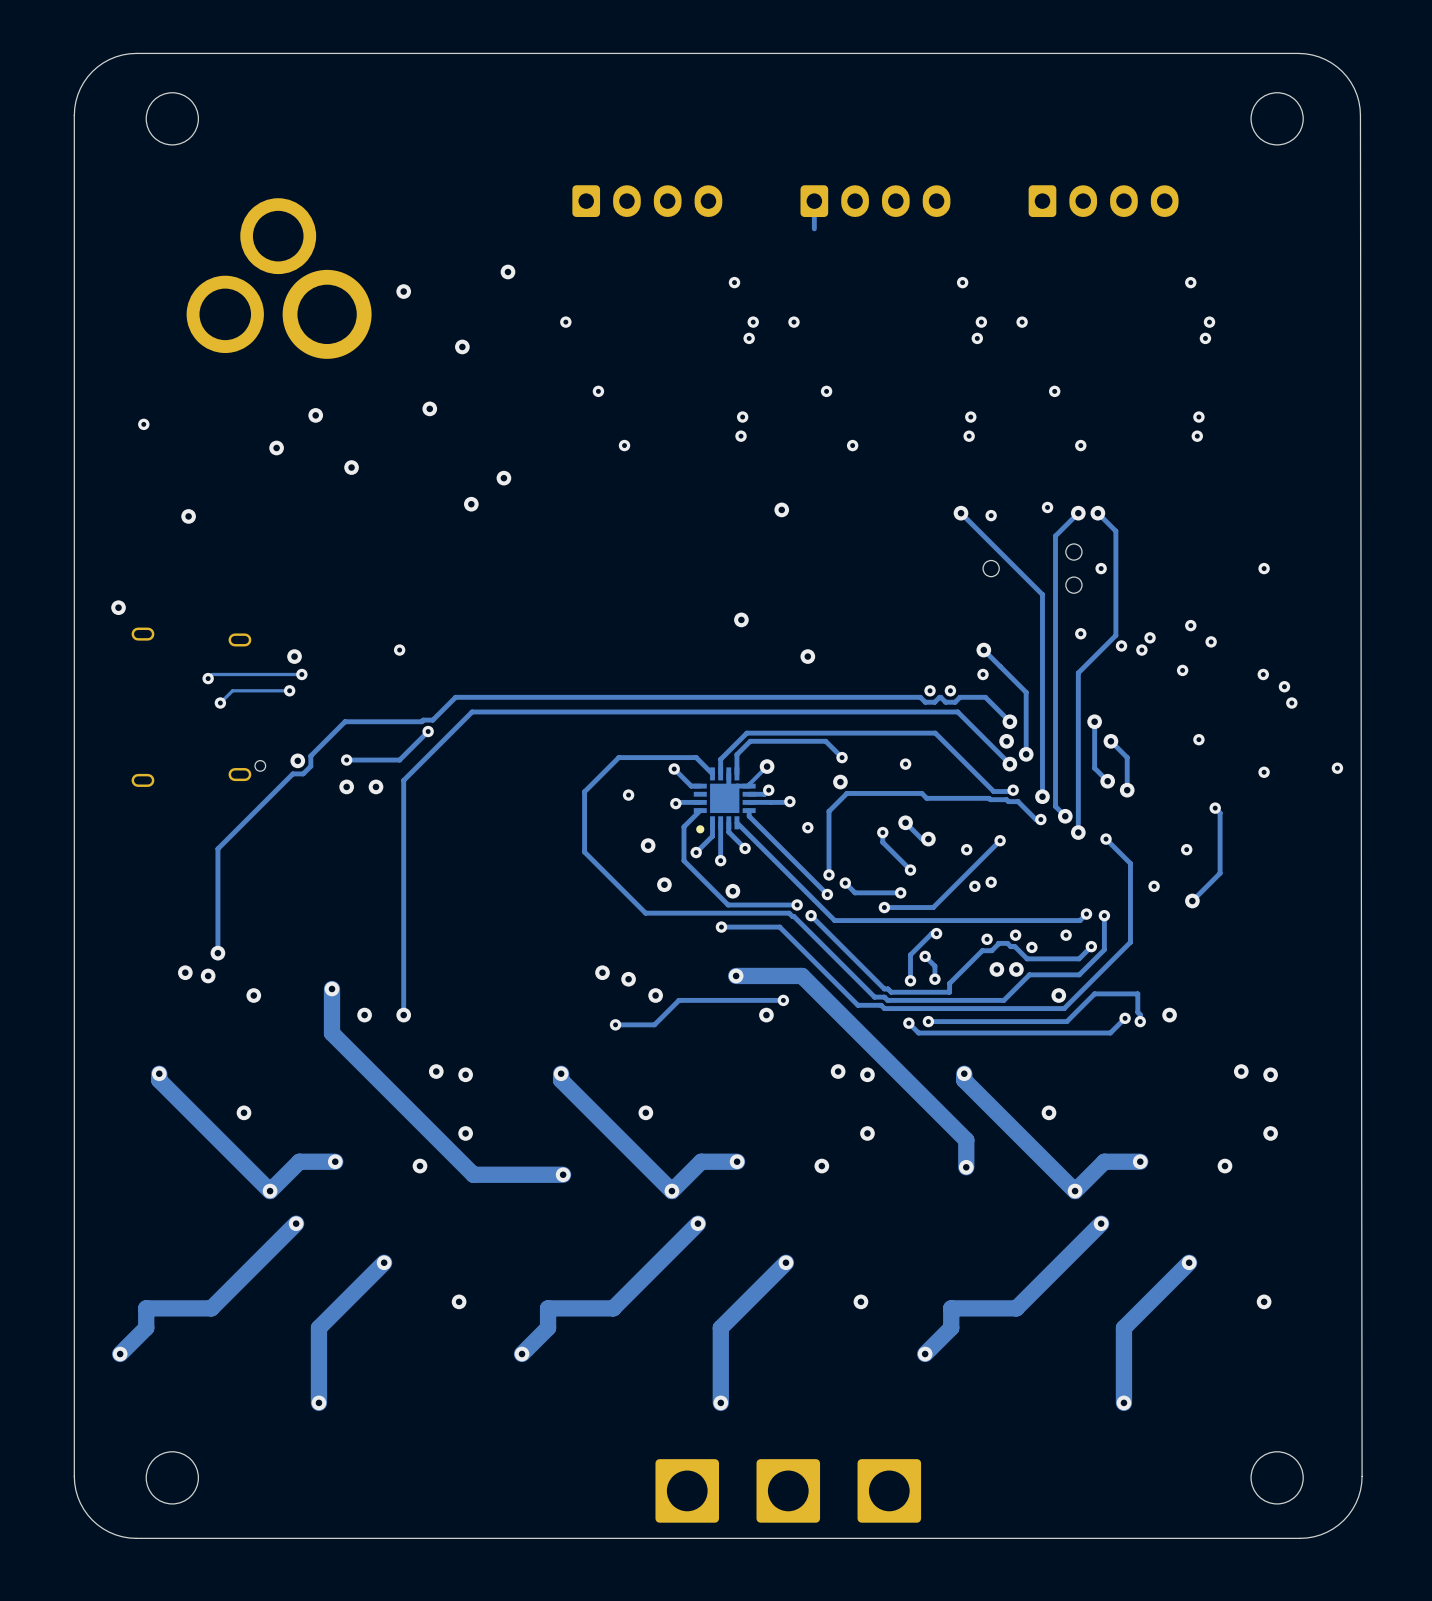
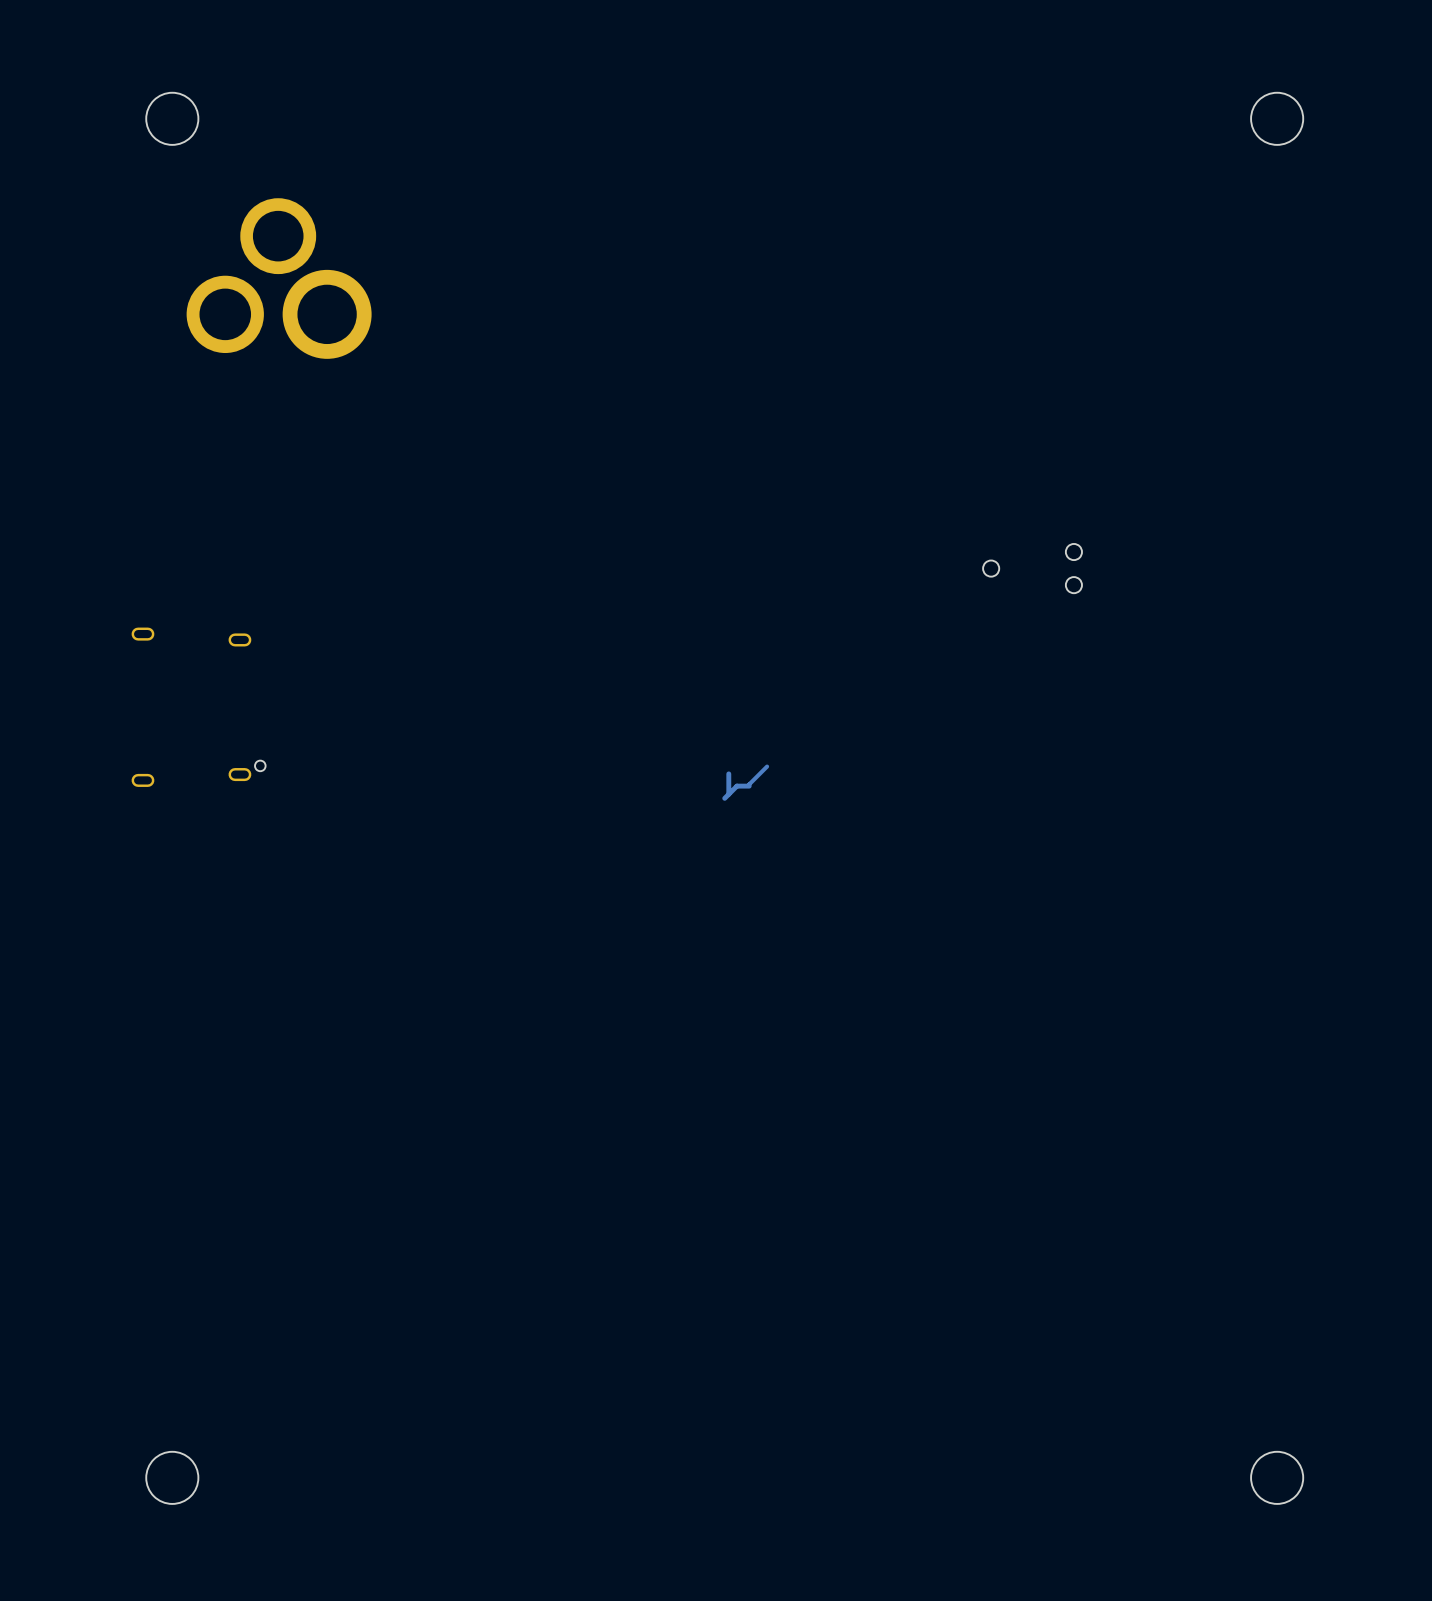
board edge: (1298, 53) (136, 53) (122, 54) (109, 59) (97, 66) (87, 76) (77, 94) (74, 115) (74, 1476) (75, 1490) (80, 1503) (87, 1515) (97, 1524) (115, 1534) (136, 1538) (1300, 1538) (1313, 1536) (1327, 1532) (1338, 1524) (1348, 1515) (1358, 1496) (1362, 1476) (1360, 115) (1356, 94) (1350, 82) (1342, 71) (1331, 62) (1318, 56) (1298, 53) -> none
part: (647, 201) -> none
track: (814, 201) (814, 228) -> none
part: (875, 201) -> none
part: (1103, 201) -> none
via: (507, 272) -> none
via: (734, 282) -> none
via: (962, 282) -> none
via: (1190, 282) -> none
via: (403, 291) -> none
via: (565, 322) -> none
via: (753, 322) -> none
via: (793, 322) -> none
via: (981, 322) -> none
via: (1022, 322) -> none
via: (1209, 322) -> none
via: (749, 338) -> none
via: (977, 338) -> none
via: (1205, 338) -> none
via: (462, 346) -> none
via: (598, 391) -> none
via: (826, 391) -> none
via: (1054, 391) -> none
via: (429, 408) -> none
via: (315, 415) -> none
via: (742, 417) -> none
via: (970, 417) -> none
via: (1198, 417) -> none
via: (143, 424) -> none
via: (741, 436) -> none
via: (969, 436) -> none
via: (1197, 436) -> none
via: (624, 445) -> none
via: (852, 445) -> none
via: (1080, 445) -> none
via: (276, 447) -> none
via: (351, 467) -> none
via: (503, 478) -> none
via: (471, 504) -> none
via: (1047, 507) -> none
via: (781, 509) -> none
track: (961, 513) (1042, 594) (1042, 796) -> none
via: (961, 513) -> none
track: (1078, 513) (1055, 535) (1055, 806) (1065, 816) -> none
via: (1078, 513) -> none
track: (1097, 513) (1115, 531) (1115, 635) (1078, 673) (1078, 832) -> none
via: (1097, 513) -> none
via: (991, 515) -> none
via: (188, 516) -> none
via: (1101, 568) -> none
via: (1264, 568) -> none
via: (118, 607) -> none
via: (741, 619) -> none
via: (1190, 625) -> none
via: (1080, 633) -> none
via: (1150, 637) -> none
via: (1211, 641) -> none
via: (1121, 645) -> none
via: (399, 650) -> none
track: (983, 650) (1026, 692) (1026, 754) -> none
via: (983, 650) -> none
via: (1141, 650) -> none
via: (294, 656) -> none
via: (807, 656) -> none
via: (1182, 670) -> none
track: (301, 674) (212, 674) (208, 678) -> none
via: (301, 674) -> none
via: (983, 674) -> none
via: (1263, 674) -> none
via: (208, 678) -> none
via: (1284, 686) -> none
track: (289, 690) (232, 690) (220, 703) -> none
via: (289, 690) -> none
via: (930, 690) -> none
via: (950, 690) -> none
via: (220, 703) -> none
via: (1291, 703) -> none
track: (1009, 721) (985, 697) (960, 697) (955, 702) (945, 702) (940, 697) (934, 702) (925, 702) (920, 697) (455, 697) (432, 720) (345, 721) (310, 755) (310, 766) (303, 773) (292, 773) (217, 848) (217, 953) -> none
via: (1009, 721) -> none
track: (1094, 721) (1094, 768) (1107, 781) -> none
via: (1094, 721) -> none
track: (428, 731) (399, 760) (346, 760) -> none
via: (428, 731) -> none
via: (1198, 739) -> none
via: (1006, 741) -> none
track: (1110, 741) (1127, 757) (1127, 790) -> none
via: (1110, 741) -> none
via: (1026, 754) -> none
track: (842, 757) (825, 741) (750, 741) (736, 754) (736, 773) -> none
via: (842, 757) -> none
via: (297, 760) -> none
via: (346, 760) -> none
via: (905, 764) -> none
track: (1009, 764) (957, 711) (472, 711) (403, 780) (403, 1015) -> none
via: (1009, 764) -> none
via: (767, 766) -> none
via: (1337, 768) -> none
track: (674, 769) (691, 786) (700, 786) -> none
via: (674, 769) -> none
via: (1264, 772) -> none
track: (712, 773) (696, 757) (618, 757) (584, 791) (584, 852) (645, 913) (789, 913) (874, 997) (884, 997) (887, 1000) (1003, 1000) (1029, 974) (1079, 974) (1104, 949) (1104, 915) -> none
track: (720, 773) (720, 759) (746, 733) (935, 733) (993, 791) (1013, 790) -> none
via: (1107, 781) -> none
via: (840, 782) -> none
via: (346, 786) -> none
via: (376, 786) -> none
track: (768, 790) (764, 794) (749, 794) -> none
via: (768, 790) -> none
via: (1013, 790) -> none
via: (1127, 790) -> none
via: (628, 795) -> none
via: (1042, 796) -> none
part: (724, 800) -> none
track: (789, 801) (749, 802) -> none
via: (789, 801) -> none
track: (1017, 801) (1035, 819) (1040, 819) -> none
track: (1017, 801) (989, 798) (926, 798) (921, 793) (846, 793) (829, 811) (829, 874) -> none
track: (700, 802) (675, 803) -> none
via: (675, 803) -> none
track: (1215, 808) (1220, 813) (1220, 873) (1192, 901) -> none
via: (1215, 808) -> none
track: (700, 810) (683, 826) (683, 860) (728, 904) (797, 904) -> none
track: (749, 810) (749, 816) (827, 894) -> none
via: (1065, 816) -> none
via: (1040, 819) -> none
track: (712, 822) (712, 836) (696, 852) -> none
track: (720, 822) (720, 860) -> none
track: (728, 822) (728, 832) (745, 848) -> none
track: (736, 822) (834, 920) (1079, 920) (1086, 914) -> none
track: (905, 822) (921, 839) (928, 839) -> none
via: (905, 822) -> none
via: (807, 827) -> none
track: (882, 832) (882, 842) (910, 870) -> none
via: (882, 832) -> none
via: (1078, 832) -> none
via: (928, 839) -> none
track: (1106, 839) (1130, 863) (1130, 942) (1064, 1008) (884, 1008) (881, 1005) (857, 1005) (779, 927) (721, 927) -> none
via: (1106, 839) -> none
track: (1000, 840) (933, 907) (884, 907) -> none
via: (1000, 840) -> none
via: (648, 845) -> none
via: (745, 848) -> none
via: (966, 849) -> none
via: (1186, 849) -> none
via: (696, 852) -> none
via: (720, 860) -> none
via: (910, 870) -> none
via: (829, 874) -> none
via: (991, 882) -> none
track: (845, 883) (855, 892) (900, 892) -> none
via: (845, 883) -> none
via: (664, 884) -> none
via: (974, 886) -> none
via: (1154, 886) -> none
via: (732, 891) -> none
via: (900, 892) -> none
via: (827, 894) -> none
via: (1192, 901) -> none
via: (797, 904) -> none
via: (884, 907) -> none
via: (1086, 914) -> none
track: (811, 915) (884, 988) (887, 988) (891, 992) (949, 992) (949, 983) (982, 950) (991, 950) (998, 943) (1007, 943) (1010, 946) (1014, 946) (1027, 958) (1079, 958) (1091, 946) -> none
via: (811, 915) -> none
via: (1104, 915) -> none
via: (721, 927) -> none
track: (936, 933) (931, 933) (910, 954) (910, 980) -> none
via: (936, 933) -> none
via: (1015, 935) -> none
via: (1066, 935) -> none
via: (987, 939) -> none
via: (1091, 946) -> none
via: (1031, 947) -> none
via: (217, 953) -> none
track: (925, 956) (934, 966) (934, 979) -> none
via: (925, 956) -> none
via: (996, 969) -> none
via: (1016, 969) -> none
via: (185, 972) -> none
via: (602, 972) -> none
via: (208, 975) -> none
track: (736, 975) (802, 975) (966, 1140) (966, 1167) -> none
via: (736, 975) -> none
via: (628, 979) -> none
via: (934, 979) -> none
via: (910, 980) -> none
track: (332, 989) (332, 1033) (473, 1174) (563, 1174) -> none
via: (332, 989) -> none
via: (253, 995) -> none
via: (655, 995) -> none
via: (1058, 995) -> none
track: (783, 1000) (678, 1000) (654, 1024) (615, 1024) -> none
via: (783, 1000) -> none
via: (364, 1015) -> none
via: (403, 1015) -> none
via: (766, 1015) -> none
via: (1169, 1015) -> none
track: (1125, 1018) (1110, 1033) (918, 1033) (908, 1023) -> none
via: (1125, 1018) -> none
via: (928, 1021) -> none
track: (1140, 1021) (1140, 1014) (1137, 1012) (1137, 993) (1094, 993) (1066, 1021) (928, 1021) -> none
via: (1140, 1021) -> none
via: (908, 1023) -> none
via: (615, 1024) -> none
via: (436, 1071) -> none
via: (838, 1071) -> none
via: (1241, 1071) -> none
track: (159, 1073) (159, 1080) (270, 1191) (299, 1161) (335, 1161) -> none
via: (159, 1073) -> none
track: (561, 1073) (561, 1080) (671, 1191) (701, 1161) (737, 1161) -> none
via: (561, 1073) -> none
track: (964, 1073) (964, 1080) (1075, 1191) (1104, 1161) (1140, 1161) -> none
via: (964, 1073) -> none
via: (465, 1074) -> none
via: (867, 1074) -> none
via: (1270, 1074) -> none
via: (244, 1112) -> none
via: (645, 1112) -> none
via: (1049, 1112) -> none
via: (465, 1133) -> none
via: (867, 1133) -> none
via: (1270, 1133) -> none
via: (335, 1161) -> none
via: (737, 1161) -> none
via: (1140, 1161) -> none
via: (419, 1166) -> none
via: (821, 1166) -> none
via: (1224, 1166) -> none
via: (966, 1167) -> none
via: (563, 1174) -> none
via: (270, 1191) -> none
via: (671, 1191) -> none
via: (1075, 1191) -> none
track: (296, 1223) (211, 1308) (146, 1308) (146, 1327) (120, 1354) -> none
via: (296, 1223) -> none
track: (697, 1223) (613, 1308) (548, 1308) (548, 1327) (522, 1354) -> none
via: (697, 1223) -> none
track: (1101, 1223) (1016, 1308) (951, 1308) (951, 1327) (925, 1354) -> none
via: (1101, 1223) -> none
track: (384, 1262) (318, 1327) (318, 1402) -> none
via: (384, 1262) -> none
track: (785, 1262) (720, 1327) (720, 1402) -> none
via: (785, 1262) -> none
track: (1189, 1262) (1123, 1327) (1123, 1402) -> none
via: (1189, 1262) -> none
via: (459, 1301) -> none
via: (860, 1301) -> none
via: (1264, 1301) -> none
via: (120, 1354) -> none
via: (522, 1354) -> none
via: (925, 1354) -> none
via: (318, 1402) -> none
via: (720, 1402) -> none
via: (1123, 1402) -> none
part: (687, 1490) -> none
part: (788, 1490) -> none
part: (889, 1490) -> none

